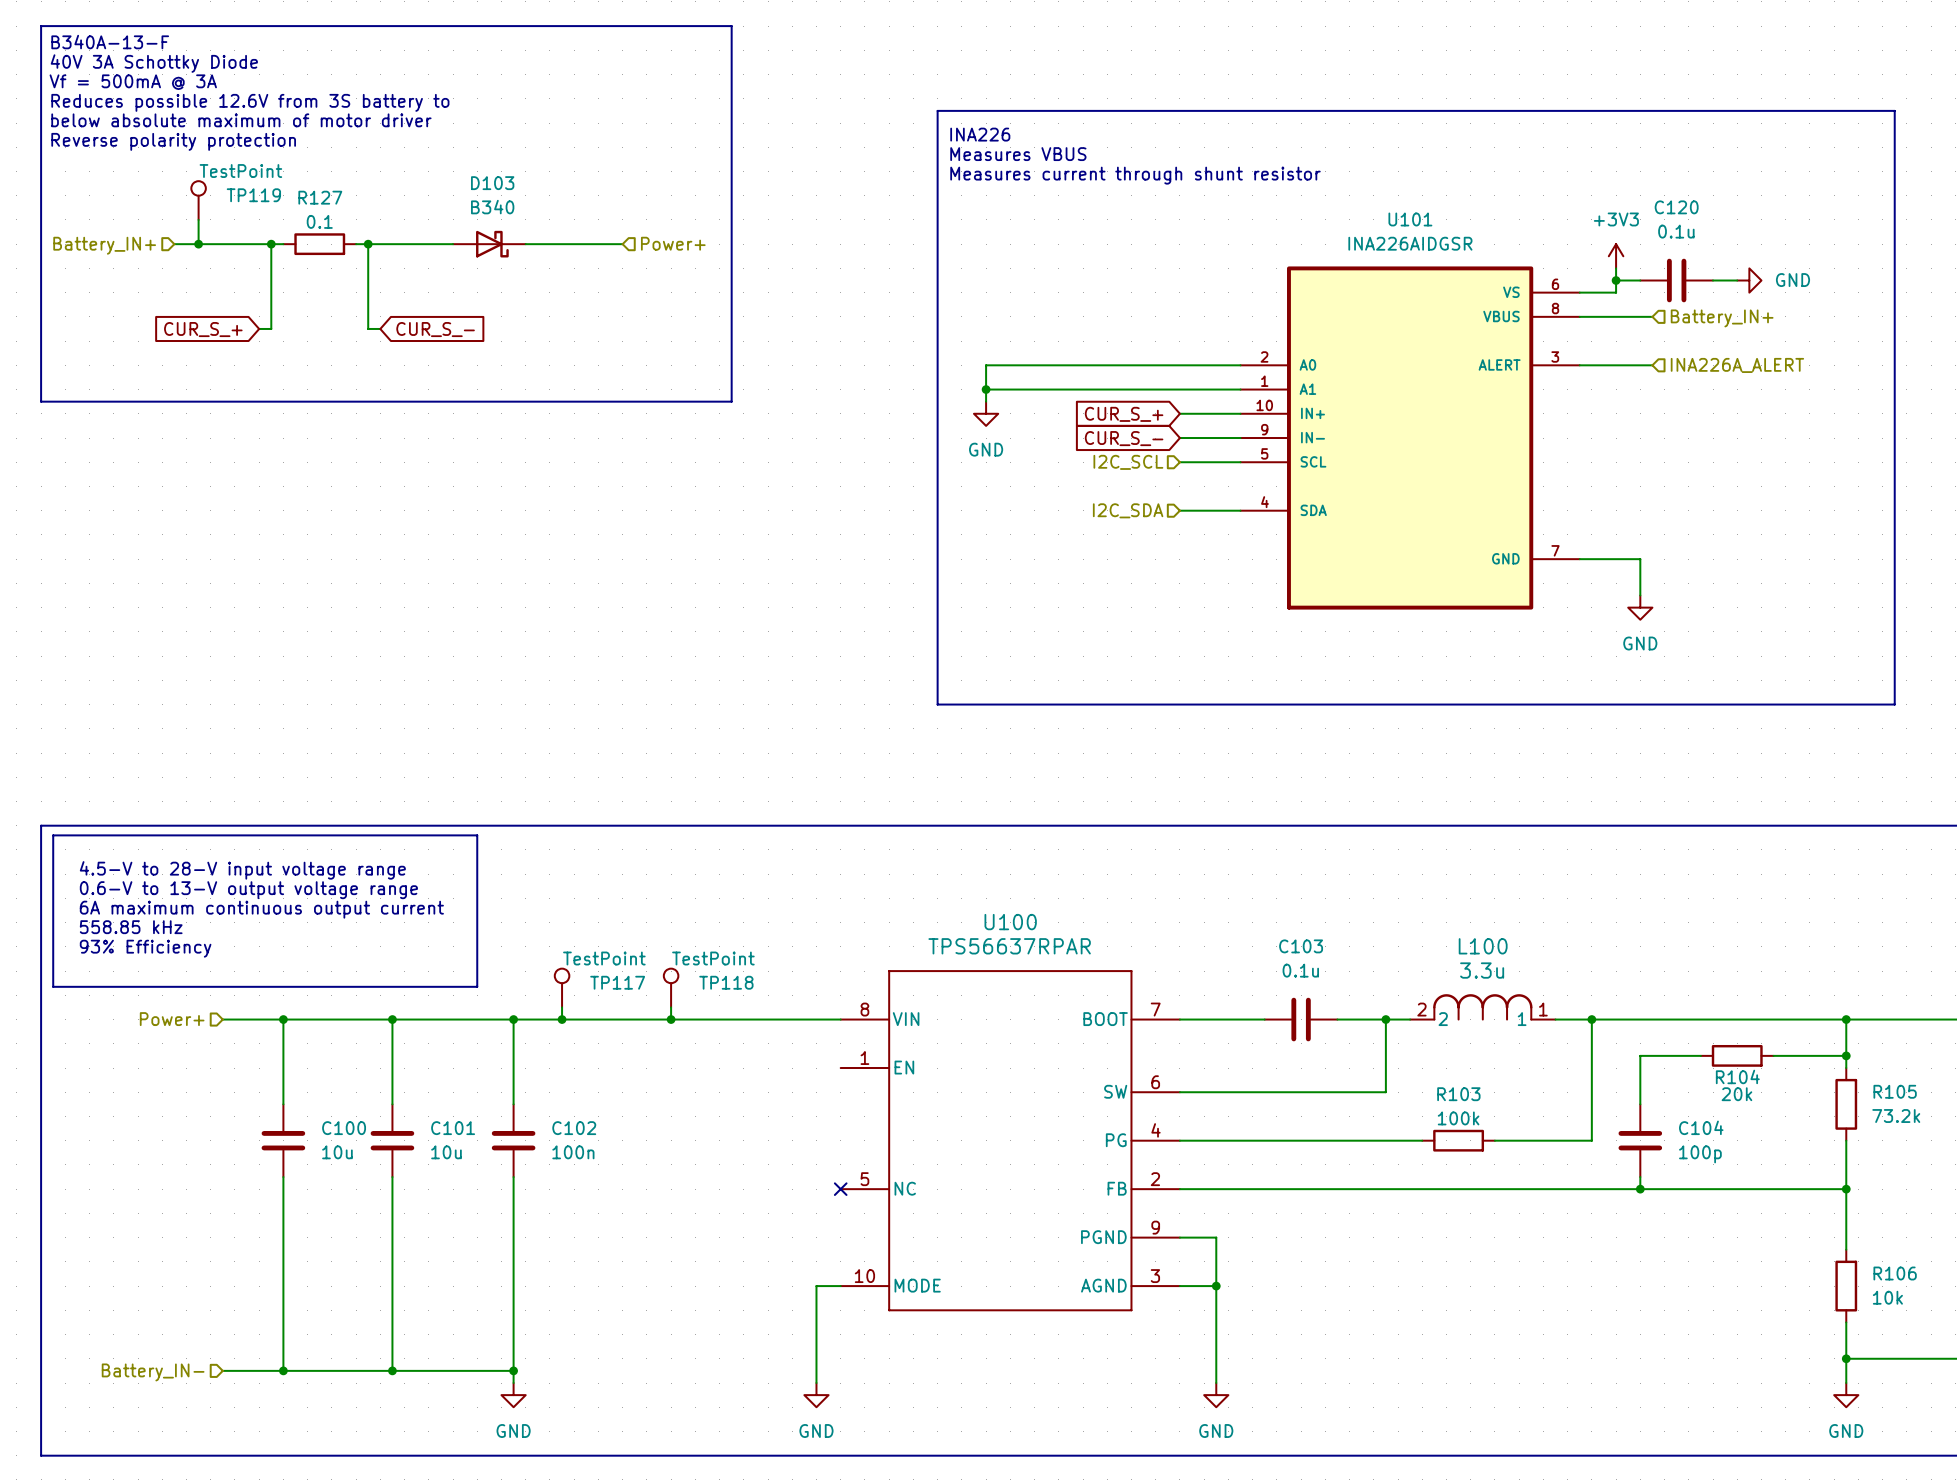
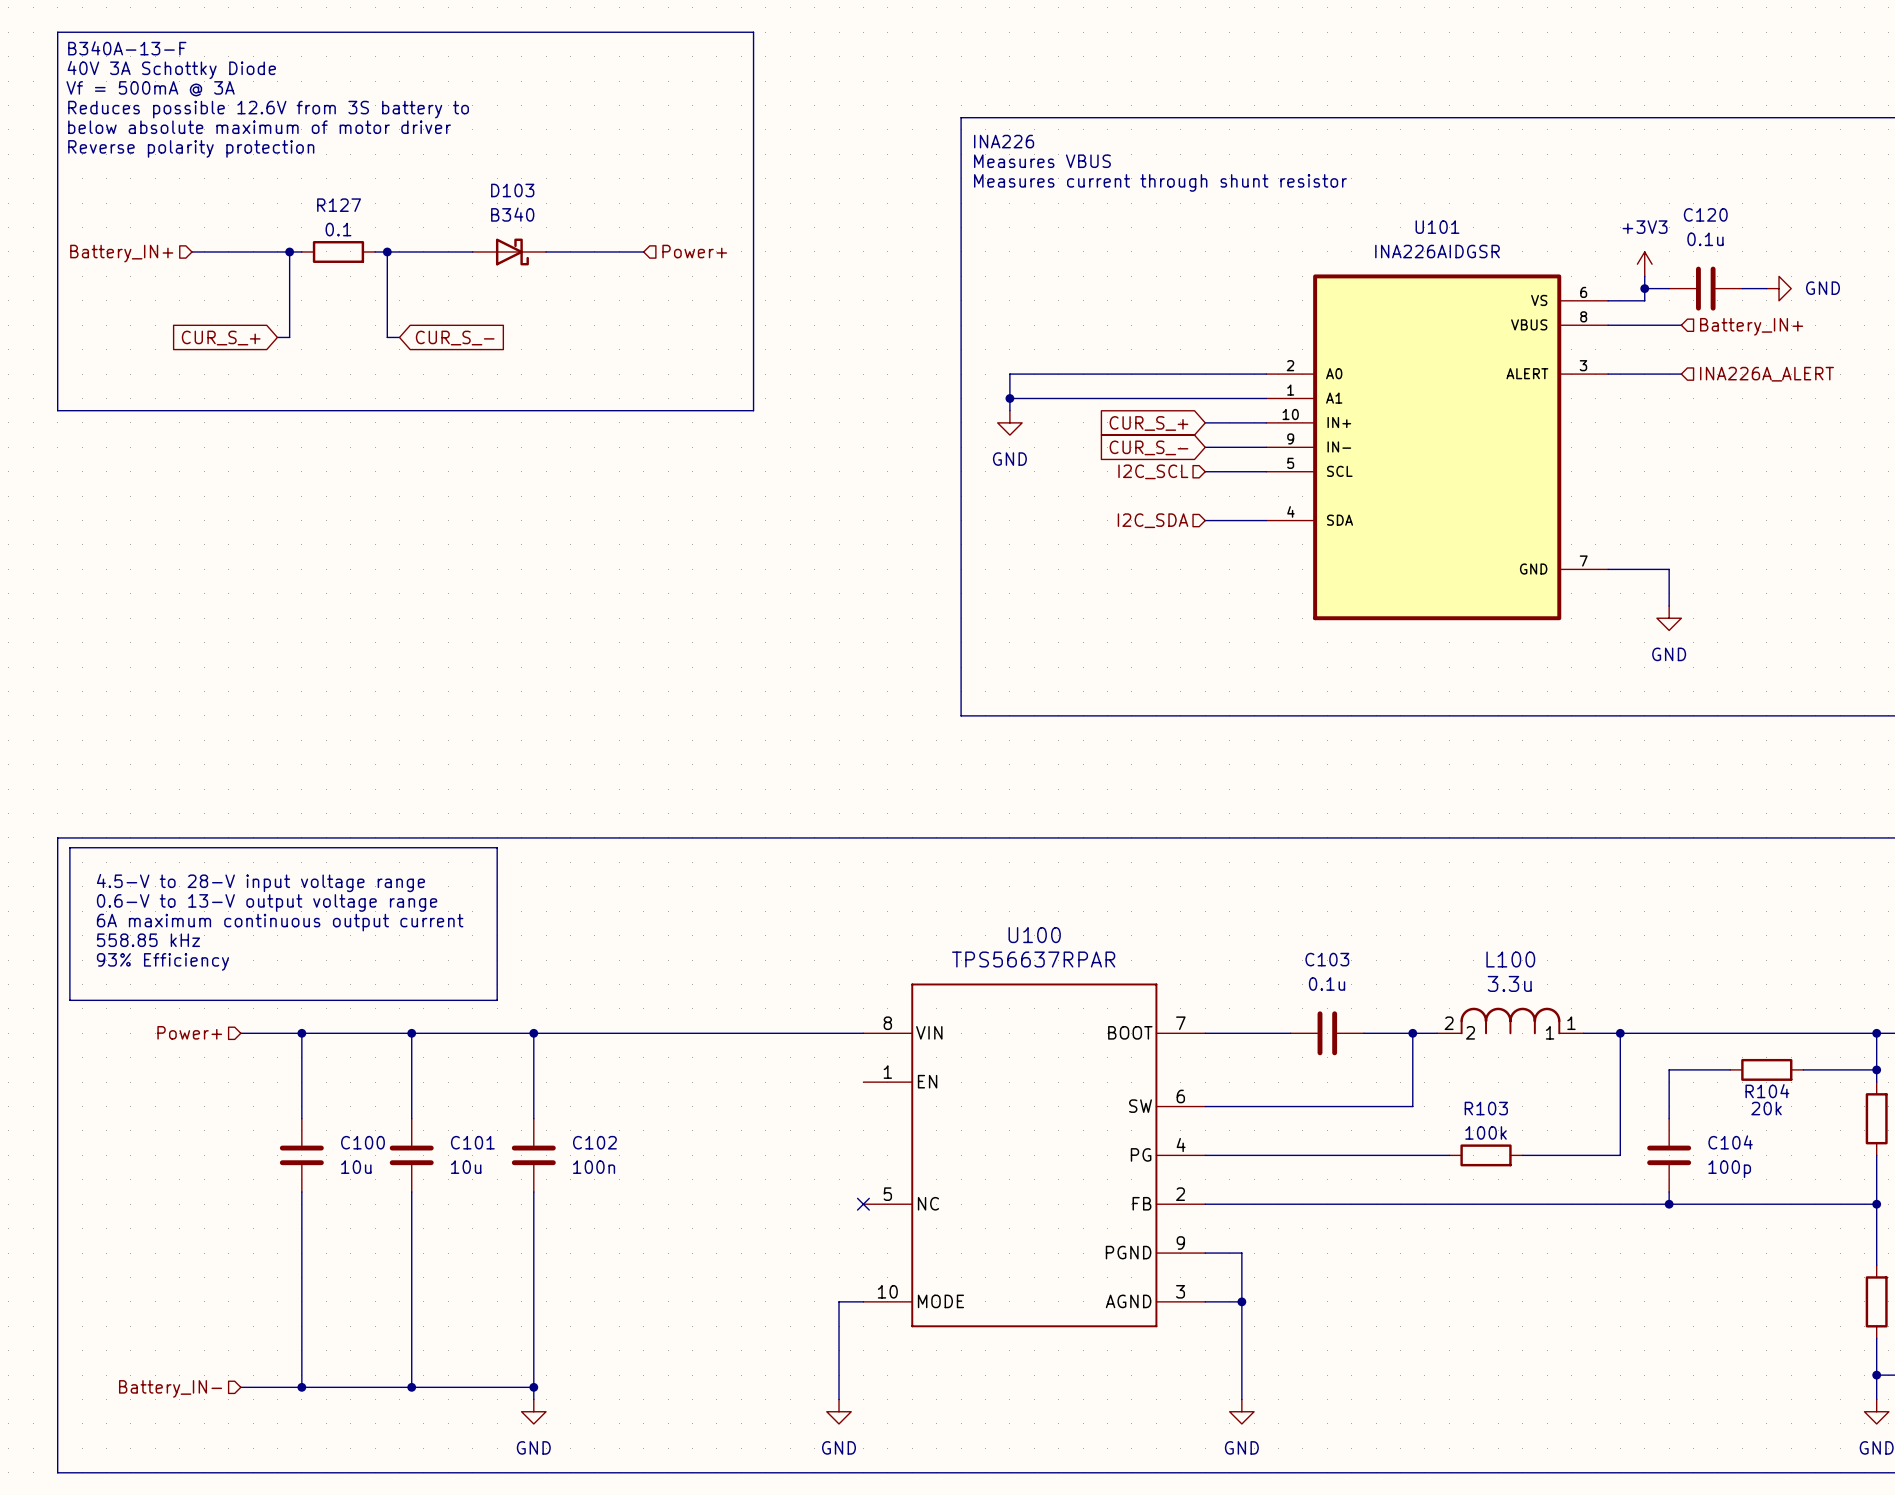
TP119: TestPoint (198, 200) -> none
wire: (198, 219) (198, 244) -> none
junction: (198, 244) -> none
TP117: TestPoint (562, 988) -> none
TP118: TestPoint (671, 988) -> none
wire: (562, 1007) (562, 1019) -> none
wire: (671, 1007) (671, 1019) -> none
junction: (562, 1019) -> none
junction: (671, 1019) -> none

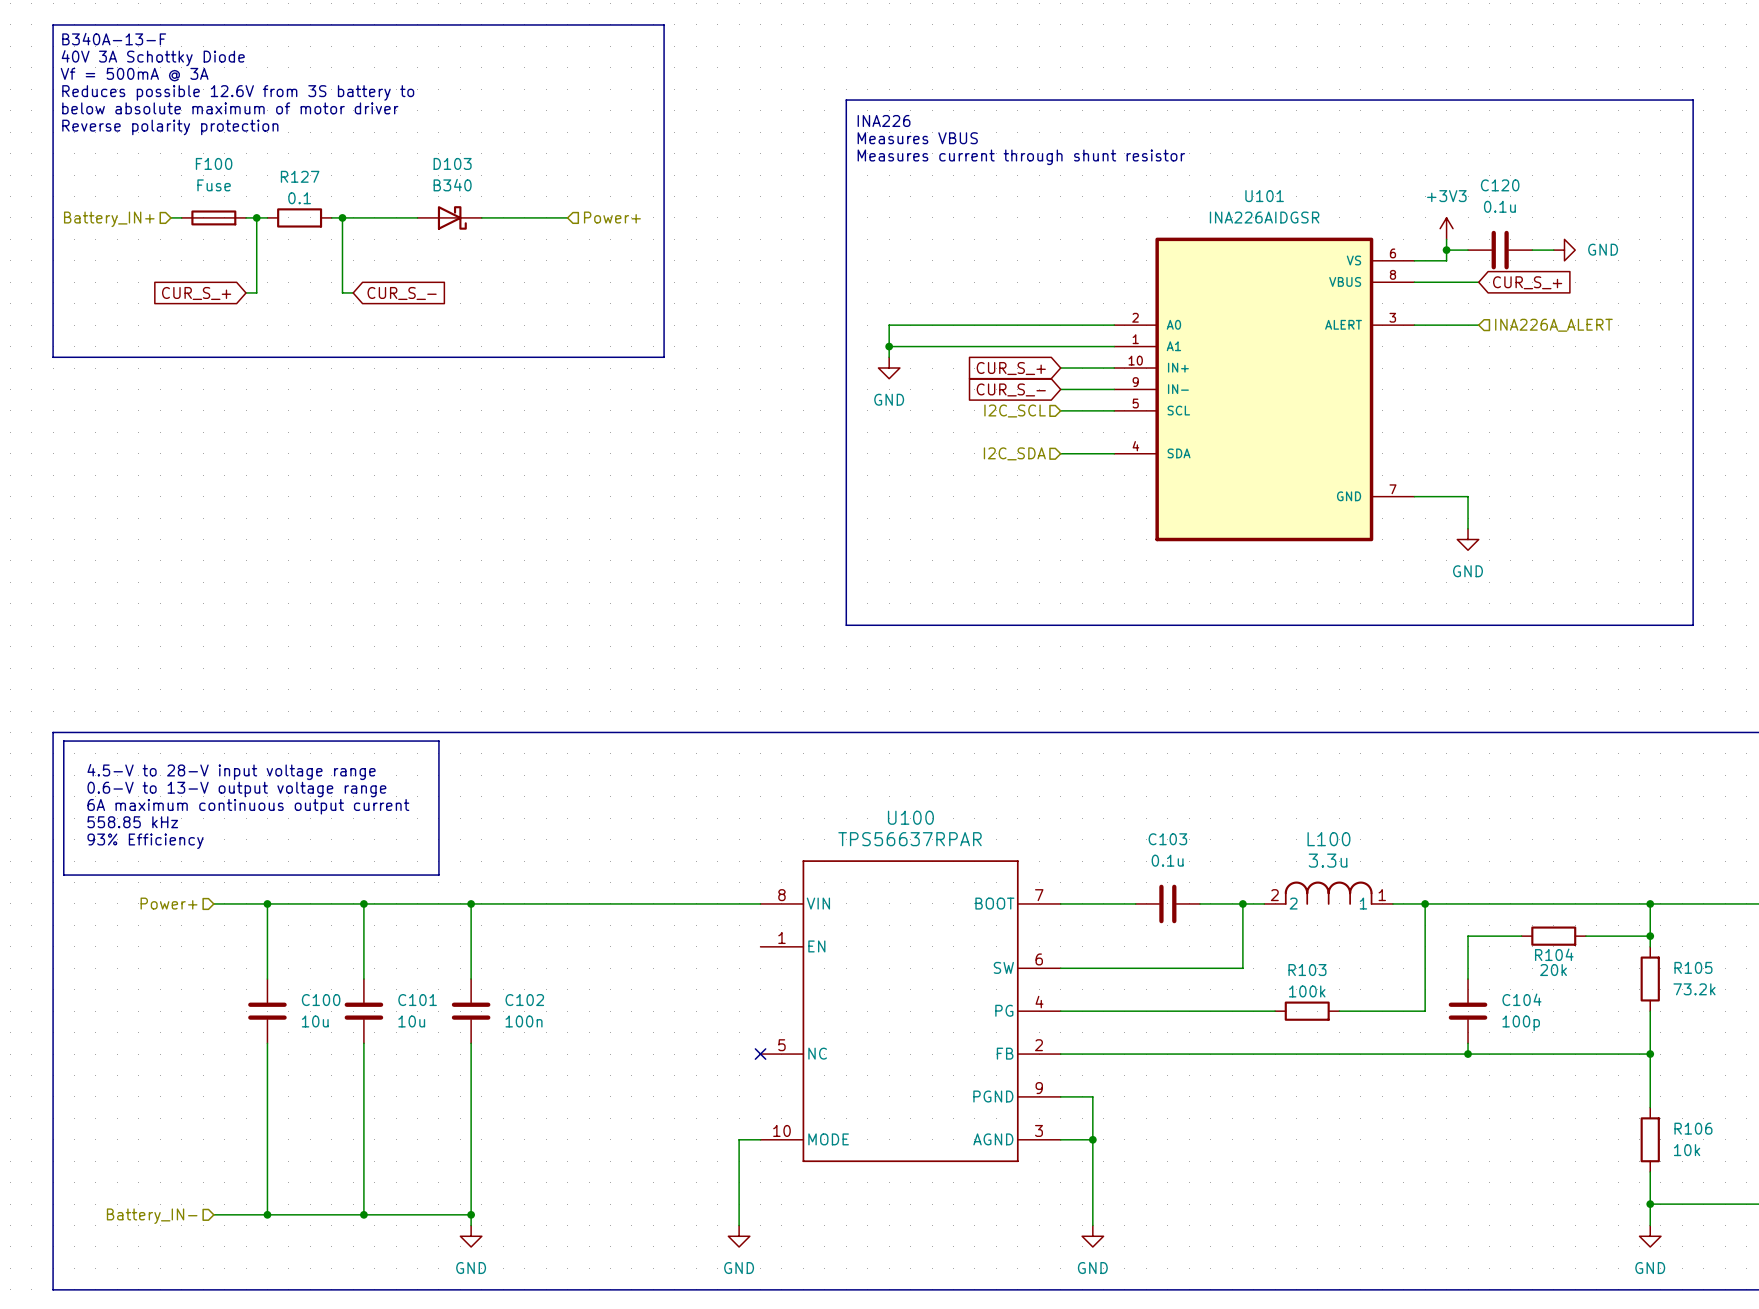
F100: none -> Fuse (213, 217)
global label: none -> CUR_S_+ (1527, 282)
hierarchical label: Battery_IN+ (1751, 326) -> none

